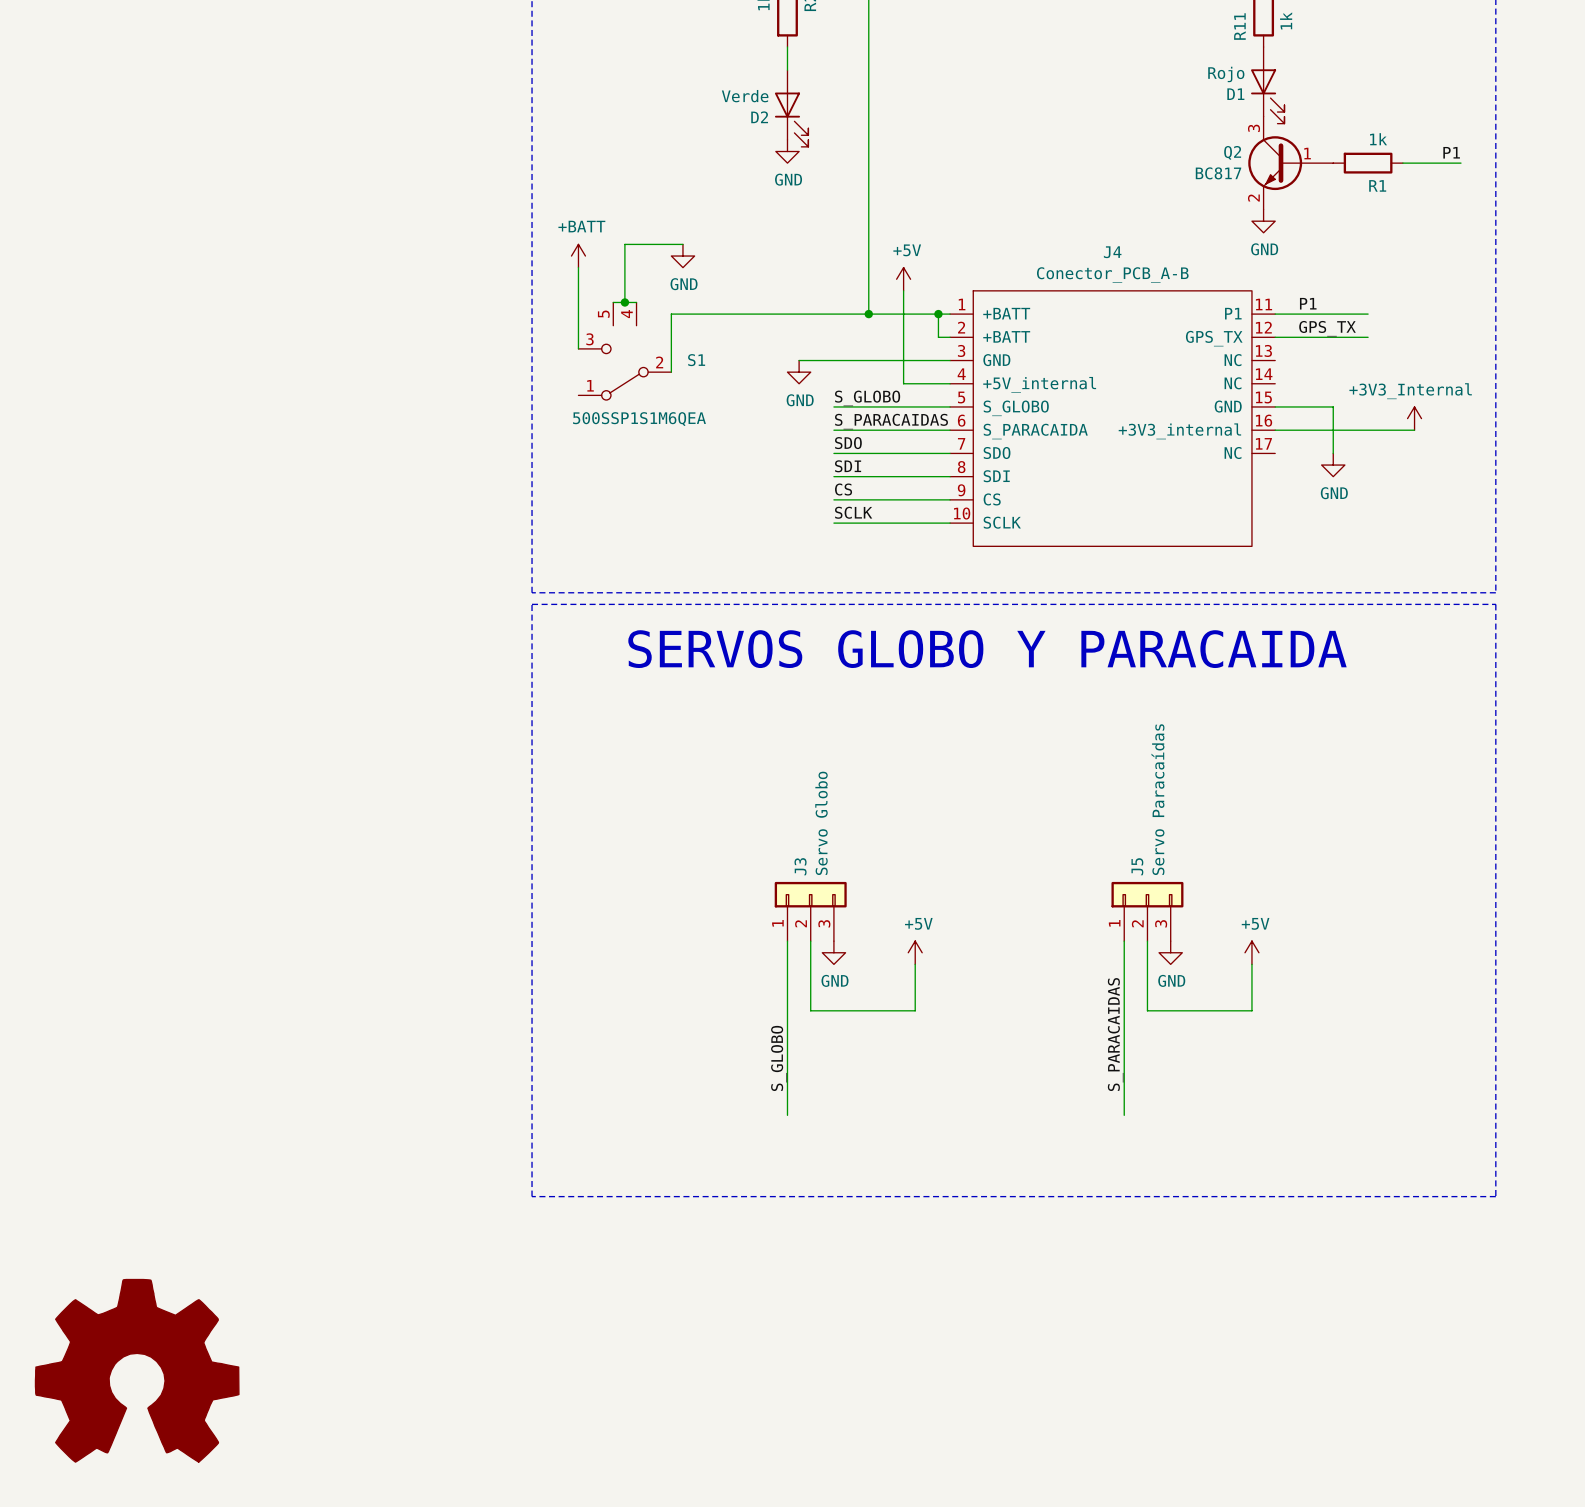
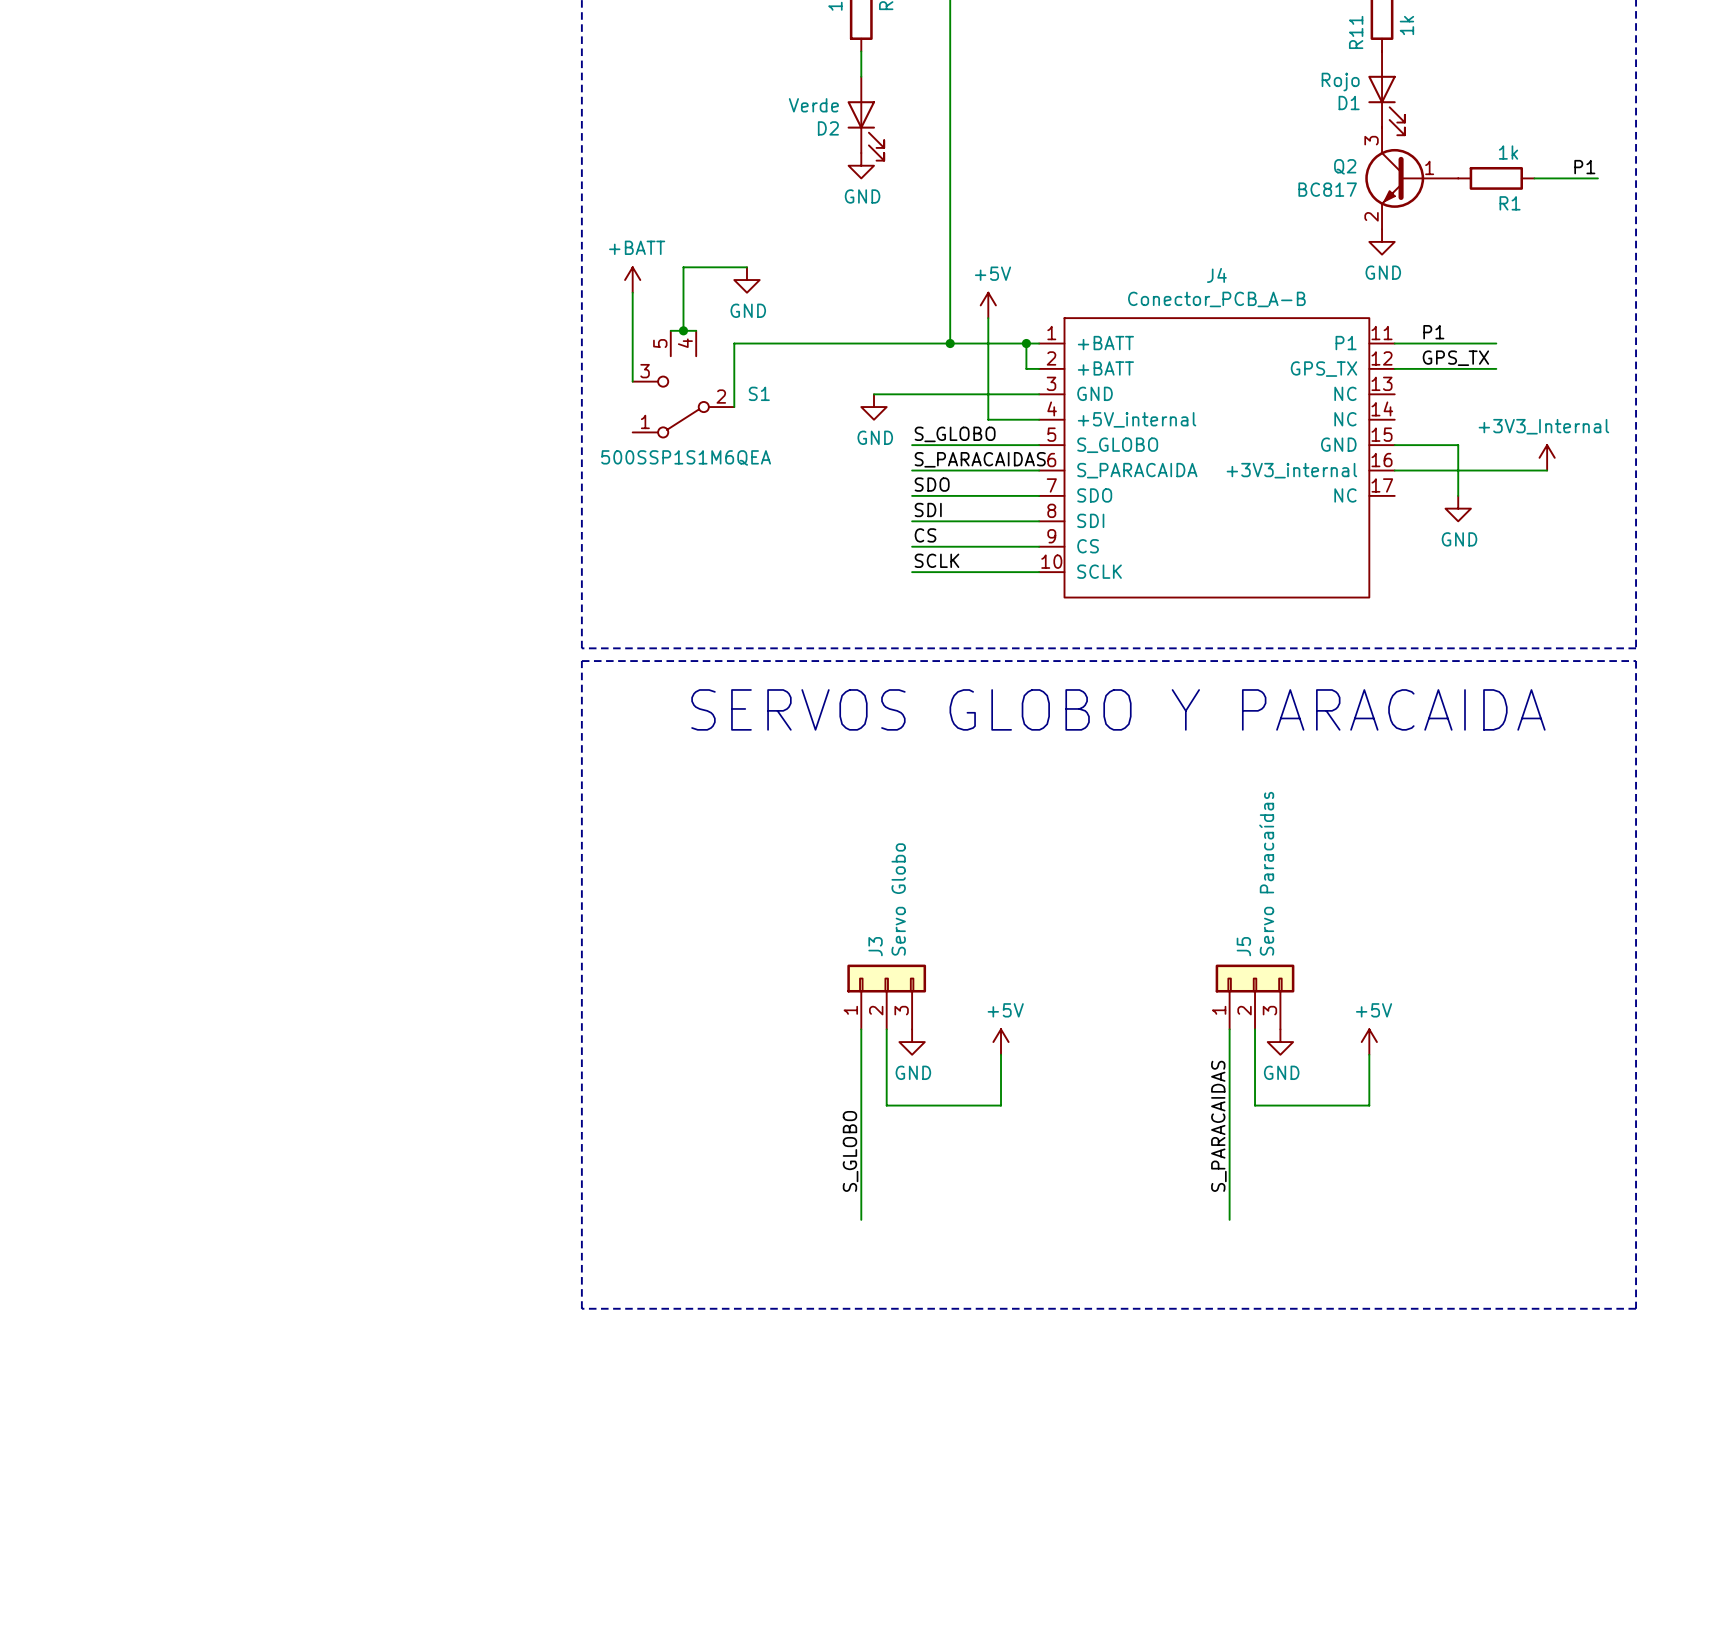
power symbol: (137, 1370) -> none

